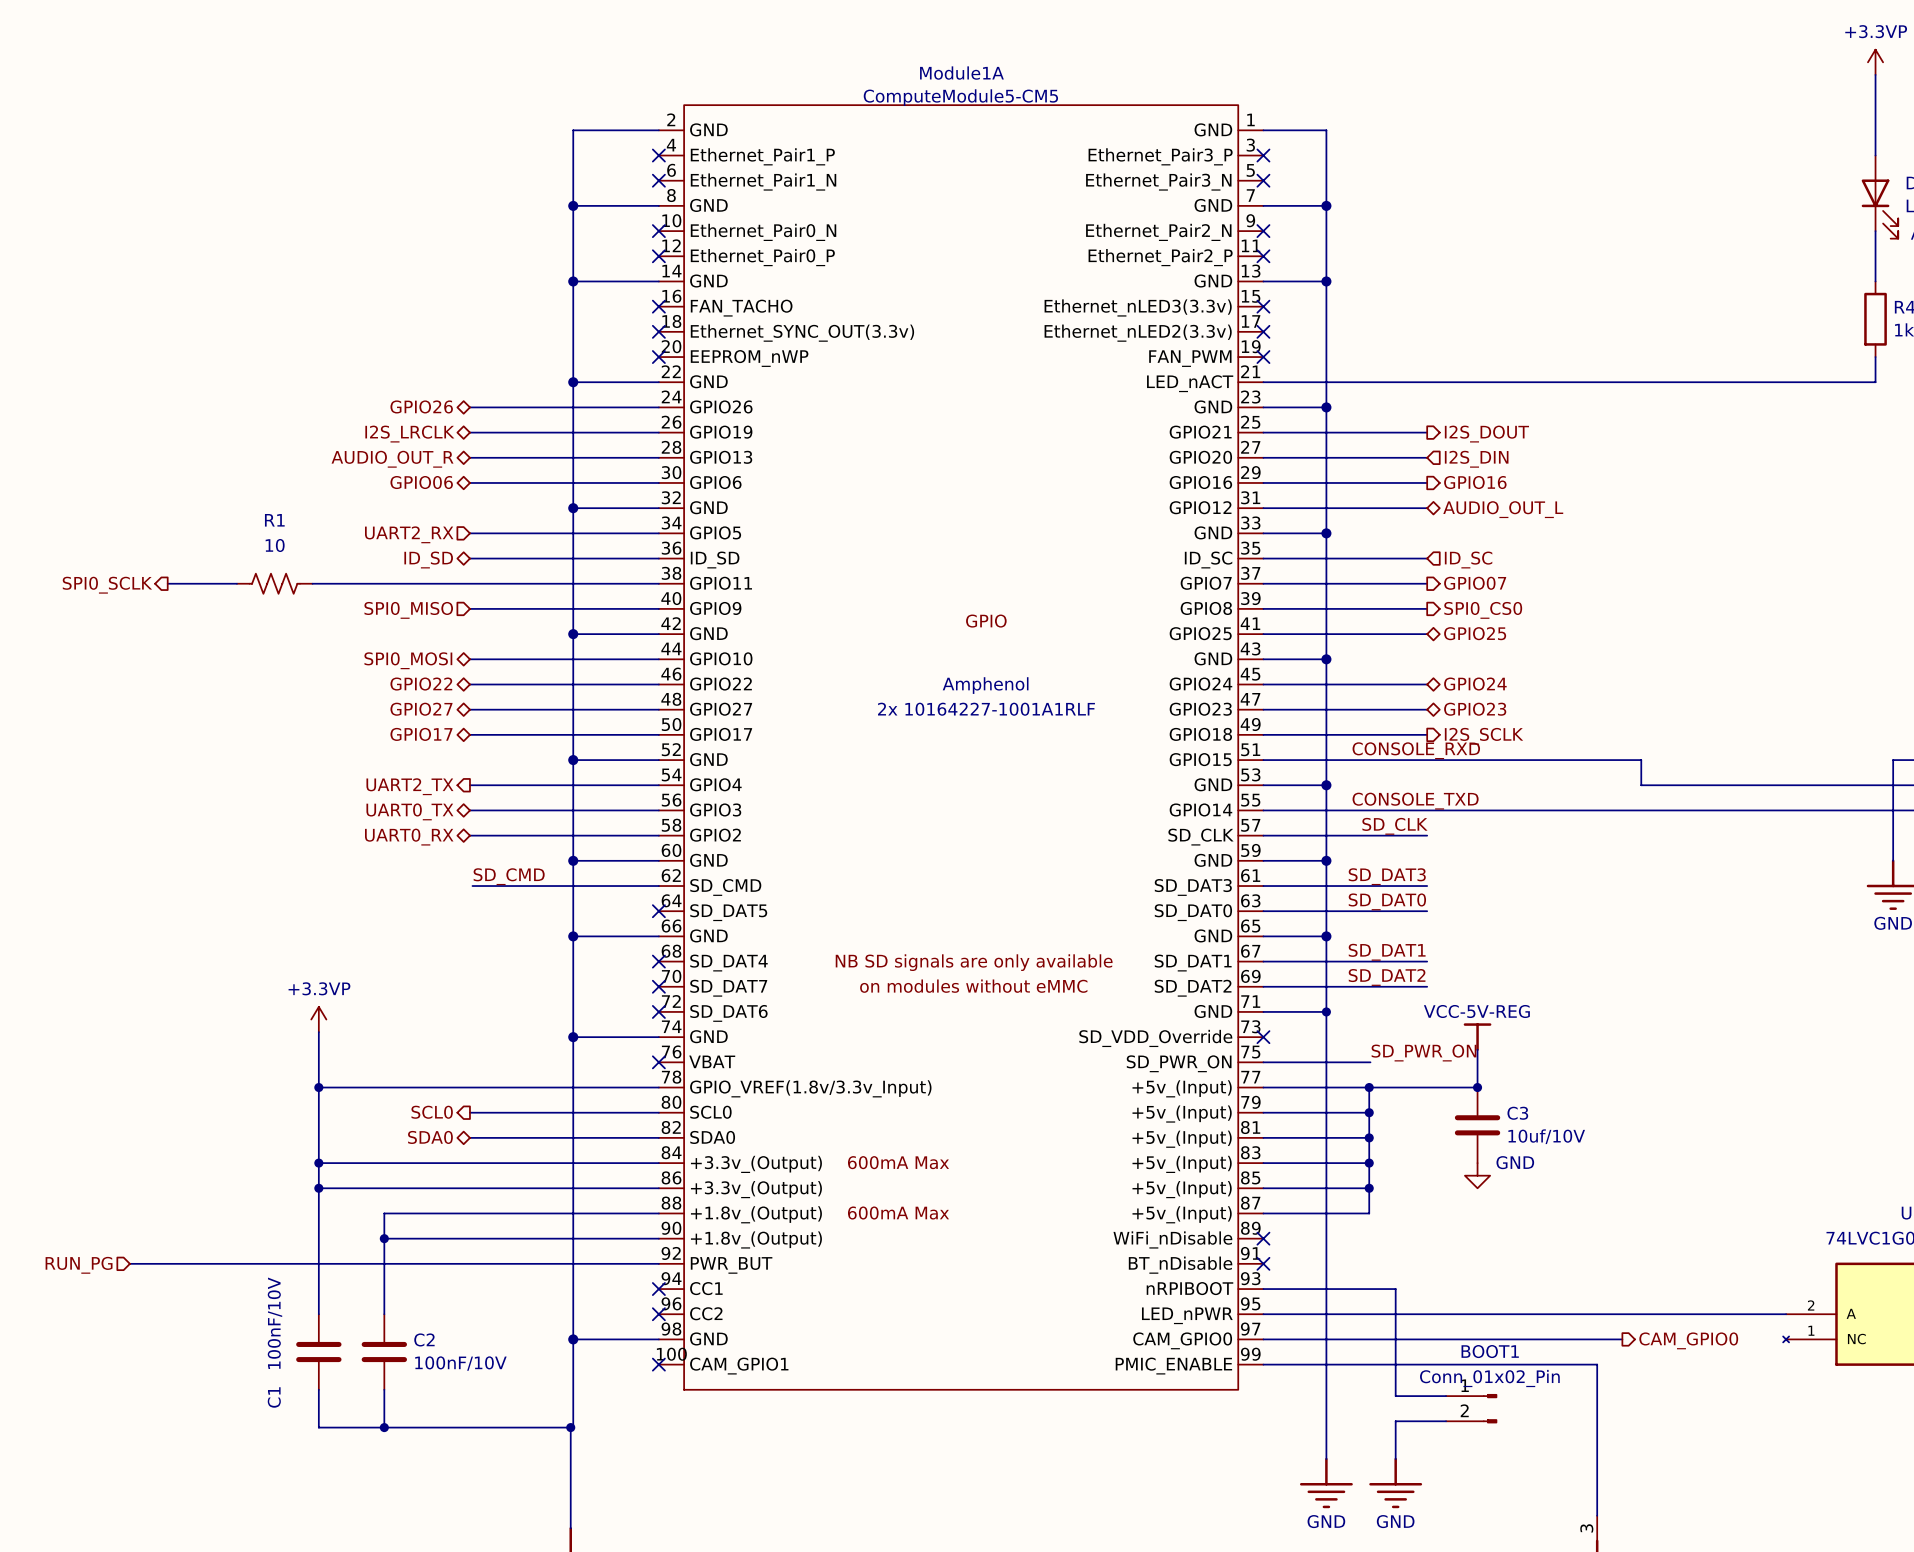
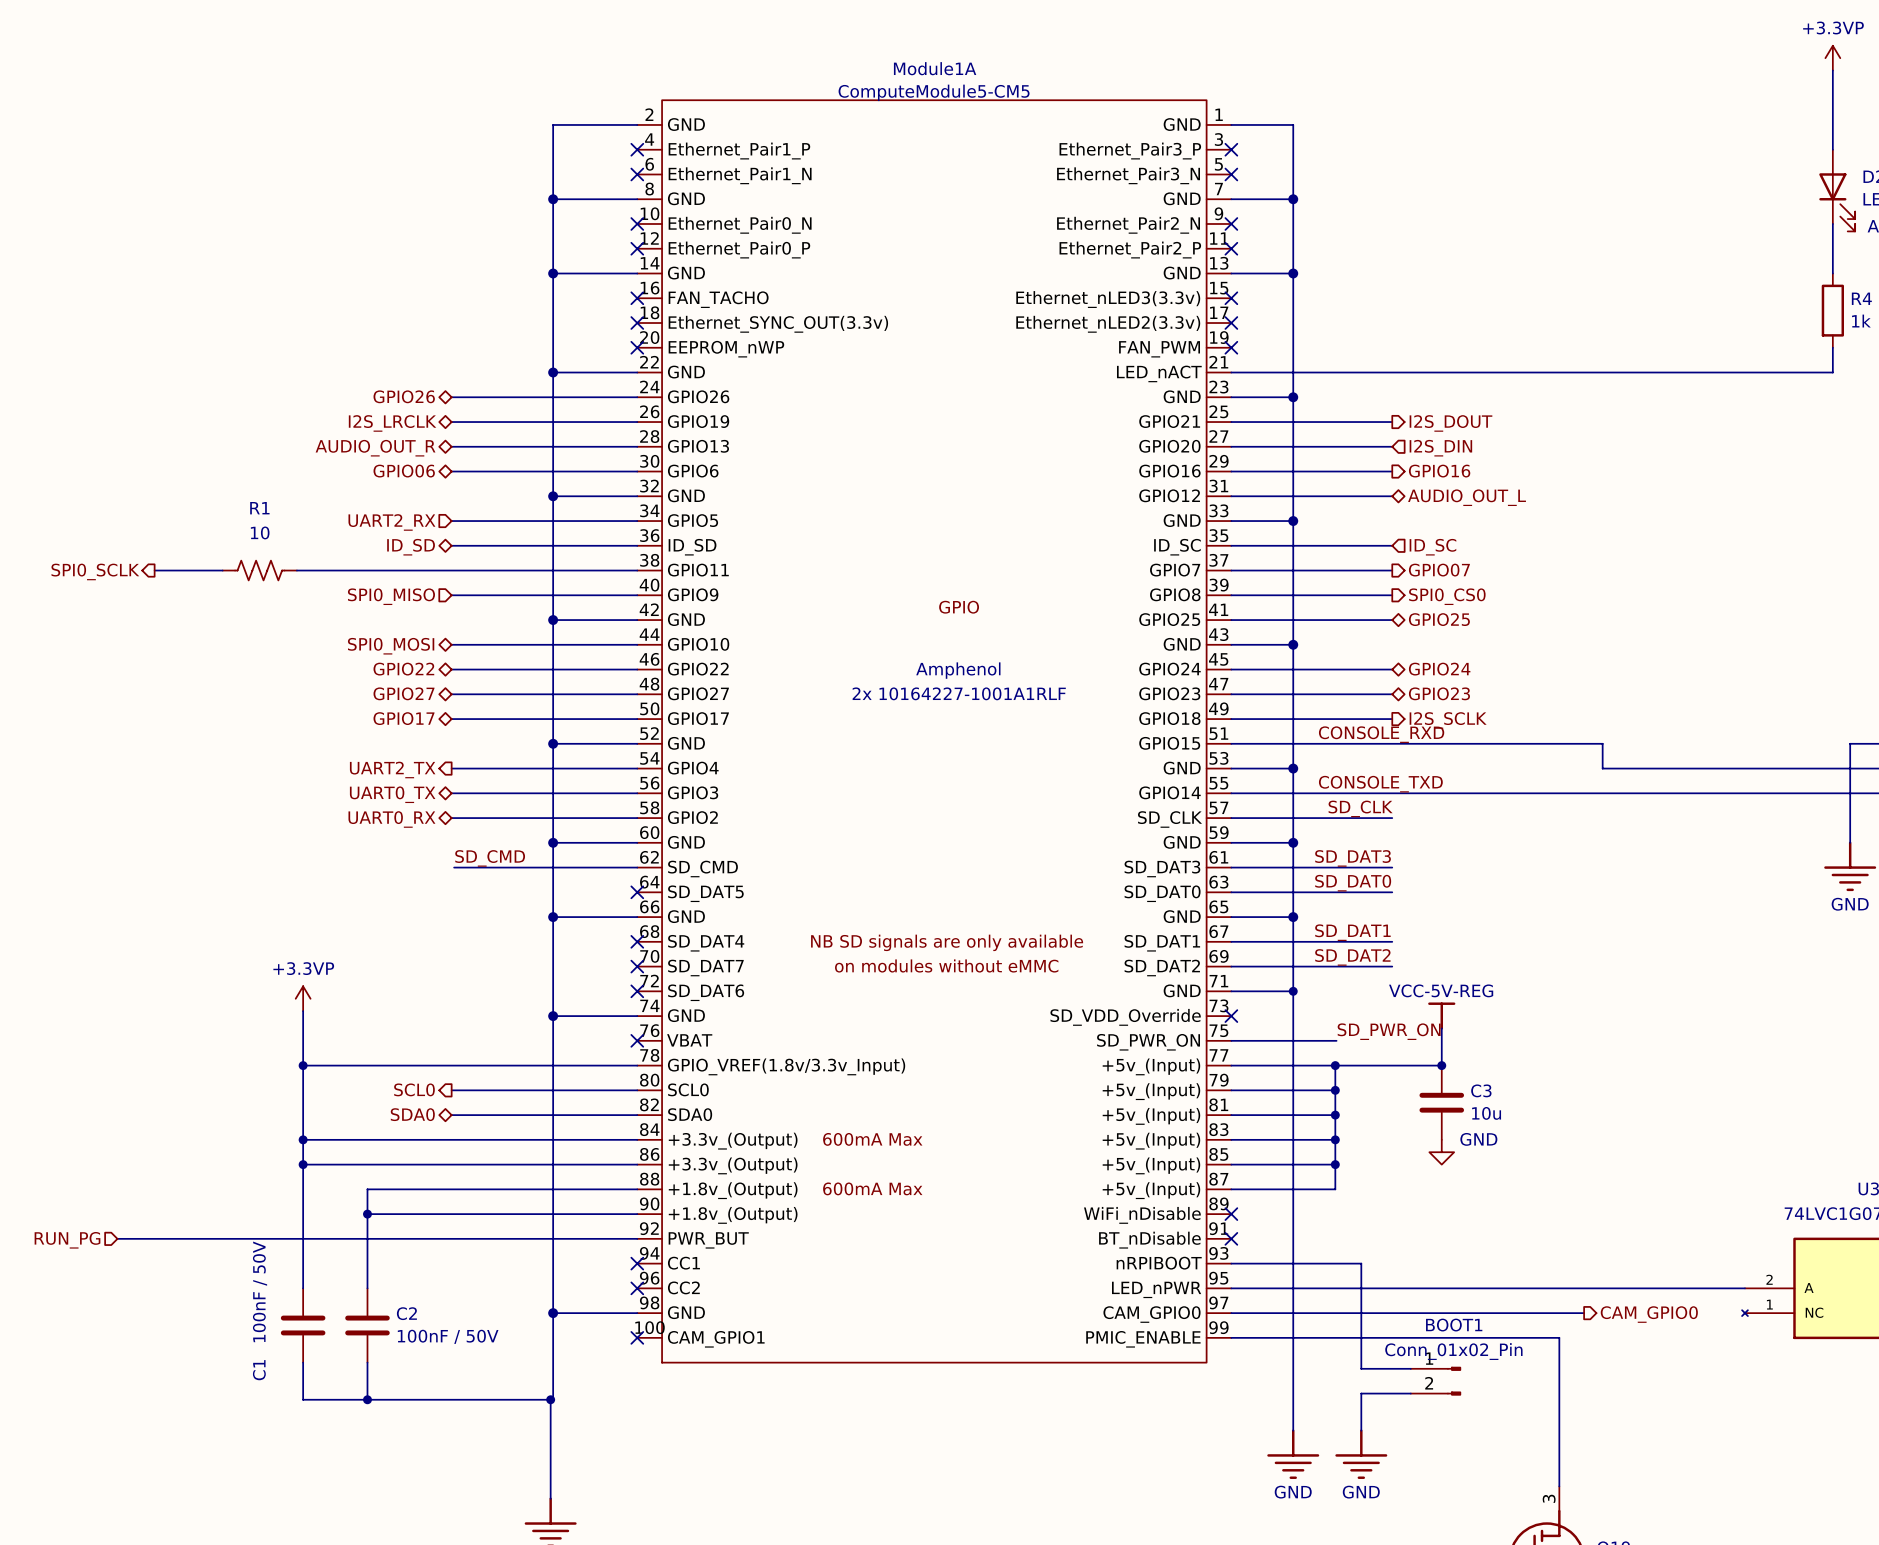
C3 value: 10uf/10V (1546, 1136) -> 10u (1486, 1113)
C1 value: 100nF/10V (274, 1323) -> 100nF / 50V (260, 1291)
C2 value: 100nF/10V (460, 1363) -> 100nF / 50V (448, 1336)

